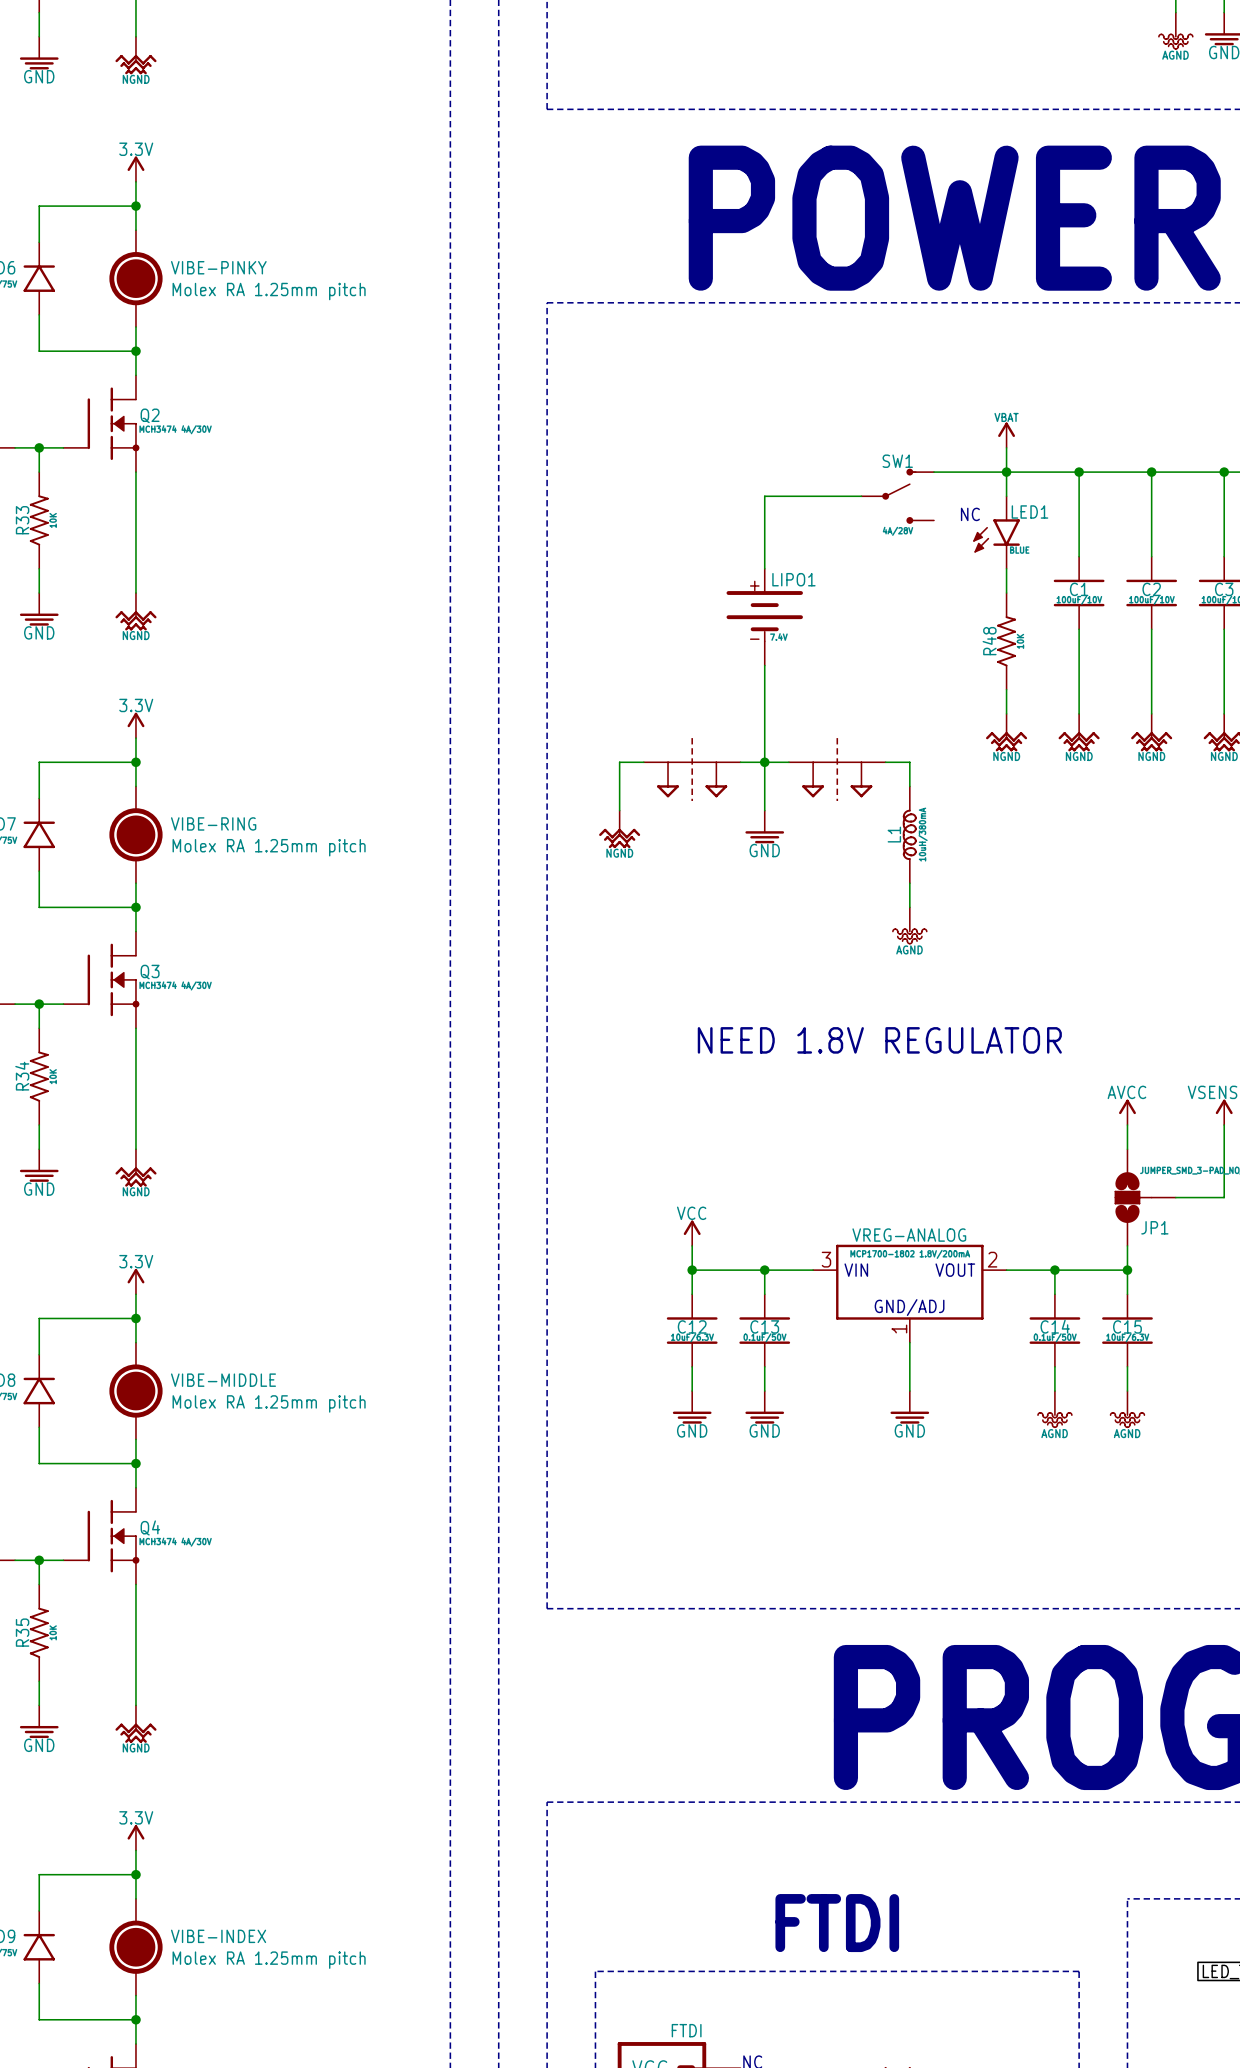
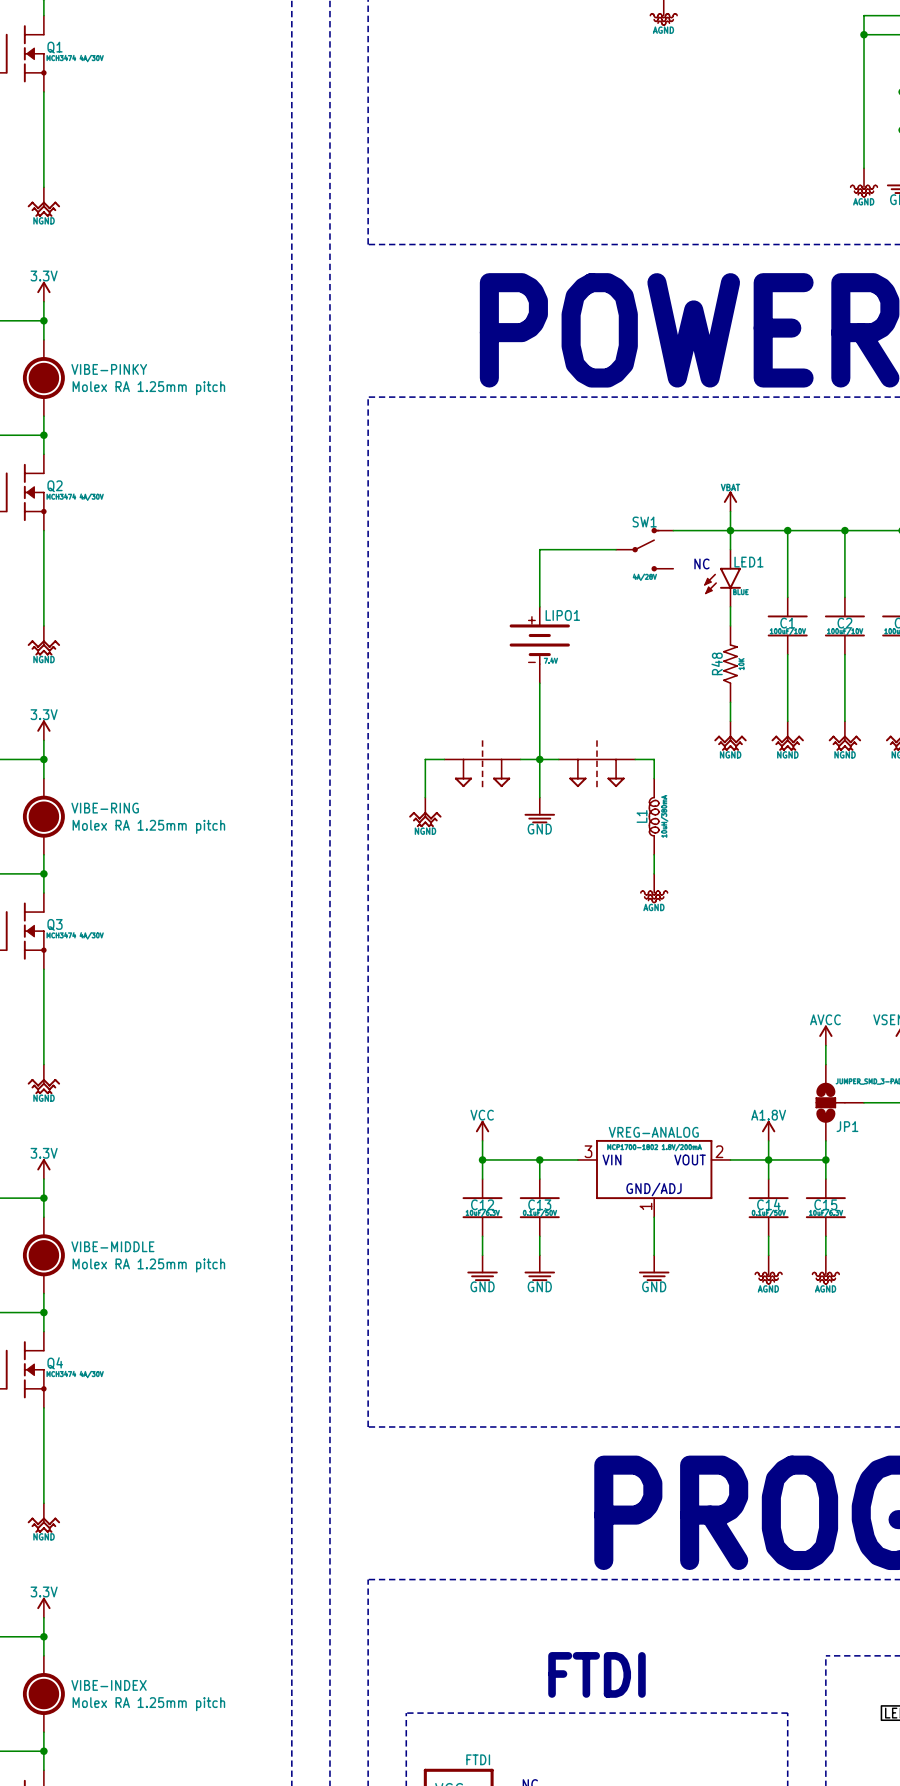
text: NEED 1.8V REGULATOR (879, 1040) -> none
power symbol: none -> (768, 1130)
wire: none -> (768, 1140) (768, 1159)

